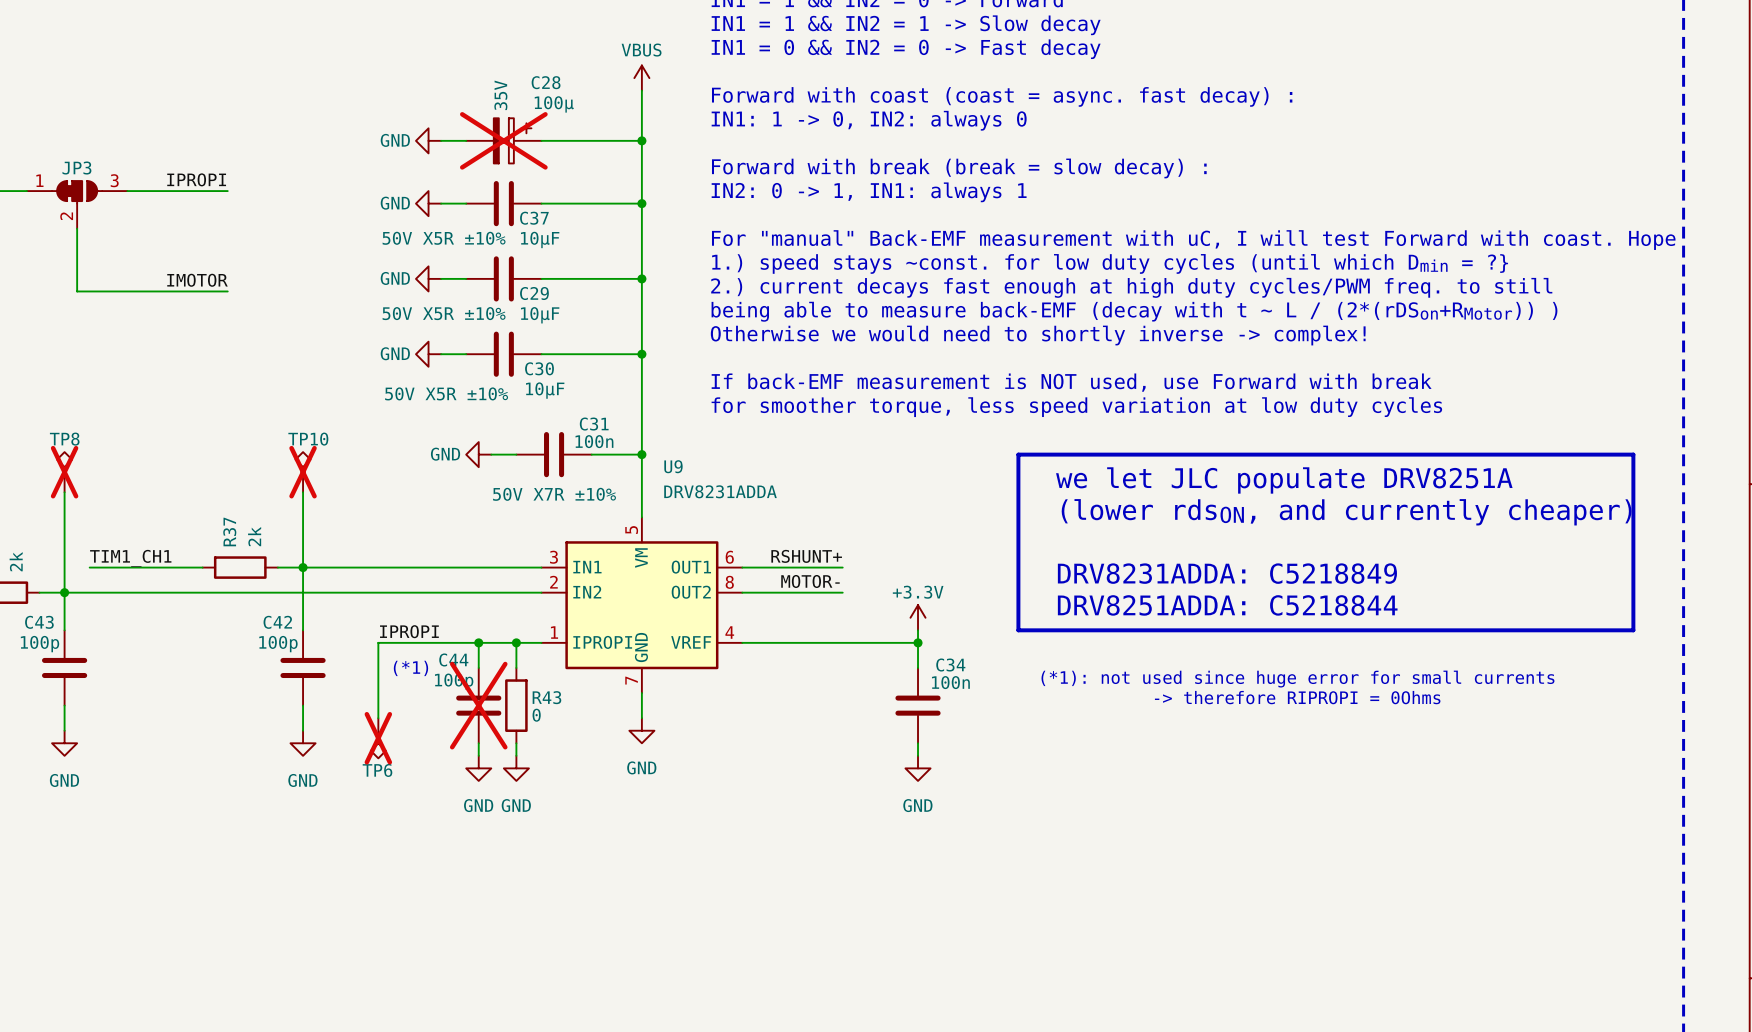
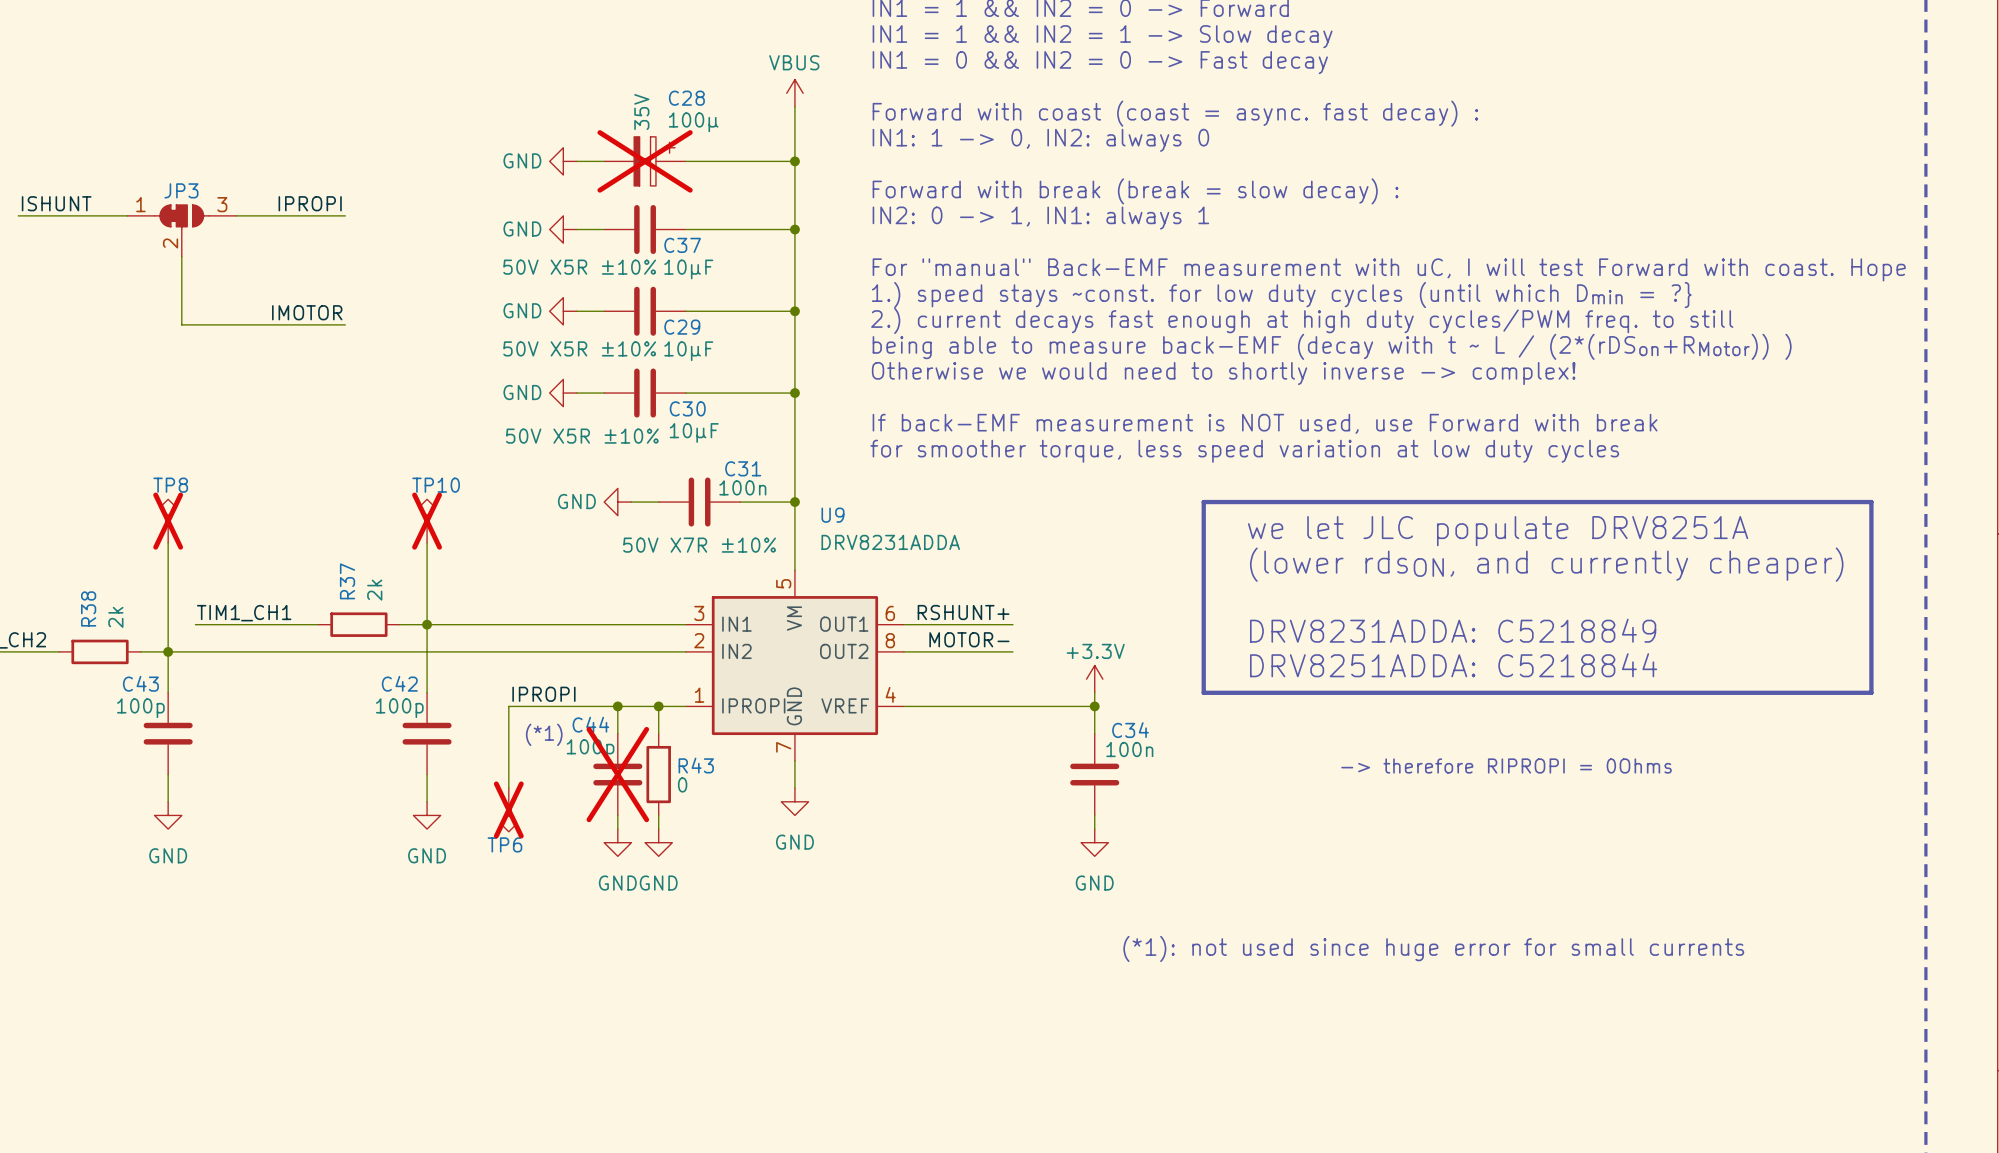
text: (*1): not used since huge error for small currents (1297, 679) -> none
text: none -> (*1): not used since huge error for small currents (1433, 948)

